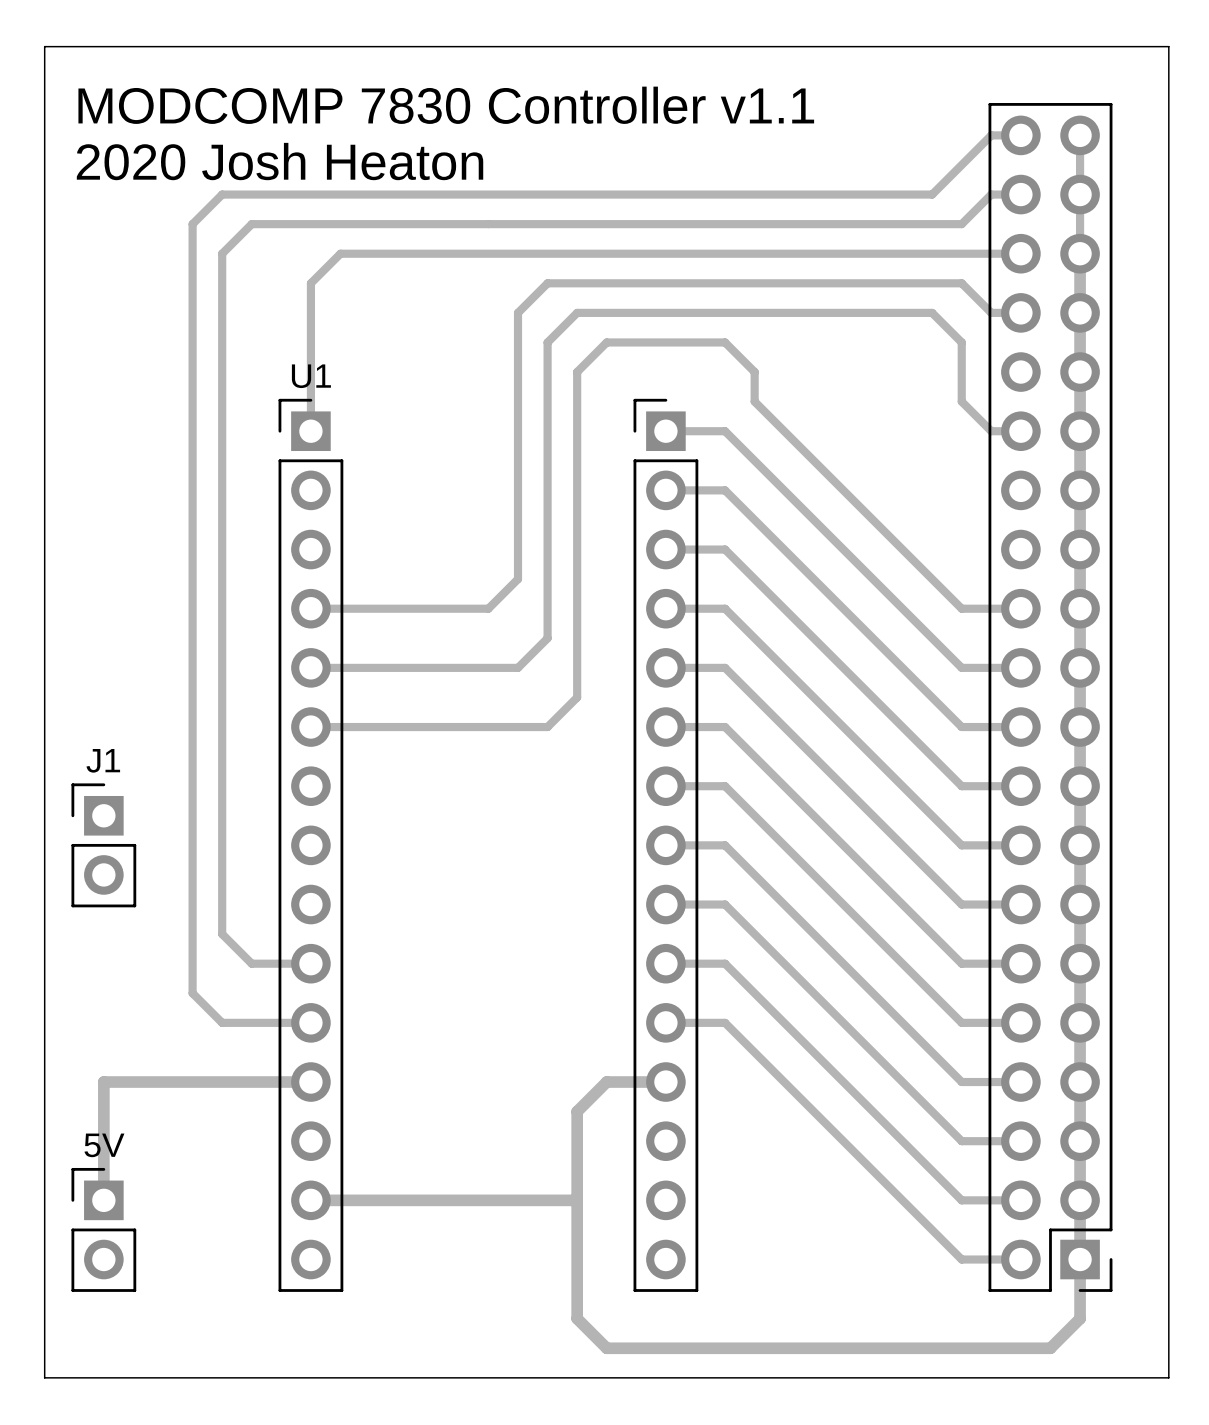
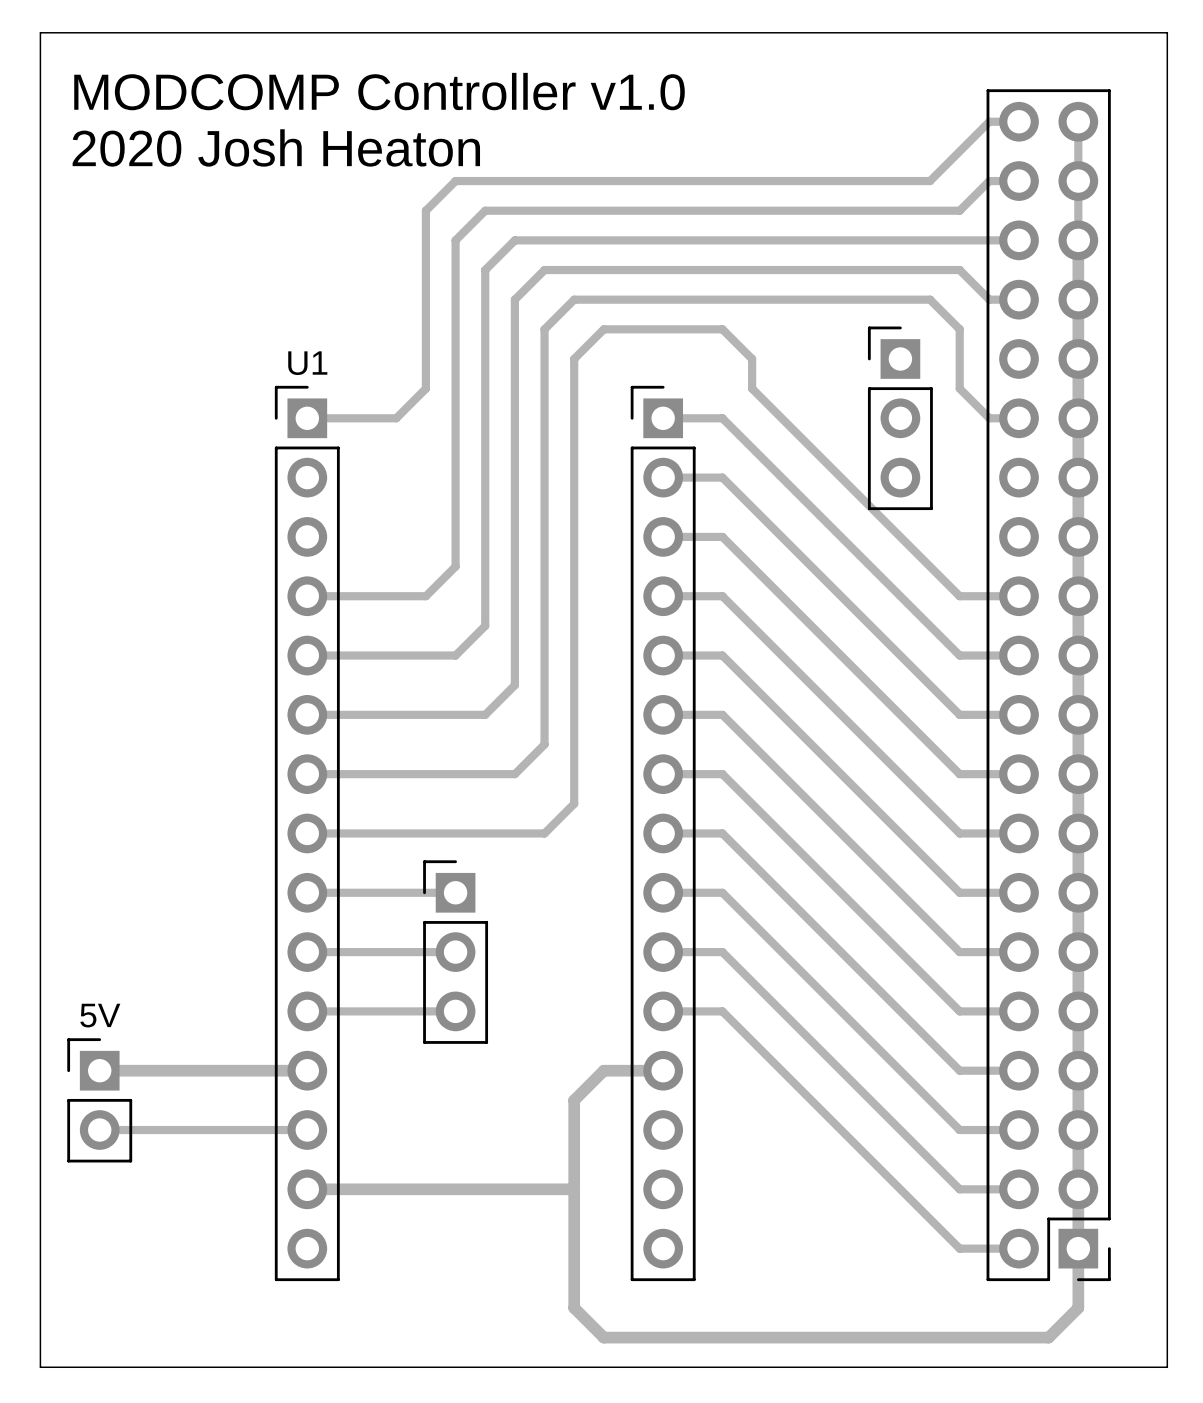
text: MODCOMP 7830 Controller v1.1 (446, 105) -> MODCOMP Controller v1.0 (379, 91)
track: (458, 194) (222, 194) (192, 224) (192, 993) (222, 1022) (310, 1022) -> (455, 1011) (307, 1011)
track: (488, 224) (251, 224) (222, 253) (222, 934) (251, 963) (310, 963) -> (485, 210) (455, 240) (455, 566) (425, 596)
track: (518, 253) (340, 253) (310, 283) (310, 431) -> (455, 181) (425, 210) (425, 388) (396, 418) (307, 418)
track: none -> (514, 240) (485, 270) (485, 625) (455, 655)
part: none -> (900, 418)
track: (518, 579) (488, 608) (429, 608) -> (514, 566) (514, 685) (485, 714)
track: (547, 638) (518, 667) (458, 667) -> (544, 625) (544, 744) (514, 774) (307, 774)
track: (577, 697) (547, 727) (488, 727) -> (574, 685) (574, 803) (544, 833) (307, 833)
J1: (103, 845) -> none
track: none -> (307, 892) (455, 892)
track: none -> (307, 952) (455, 952)
part: none -> (455, 952)
track: (103, 1082) (103, 1200) -> none
track: none -> (99, 1130) (307, 1130)
5V position: (103, 1229) -> (99, 1100)

